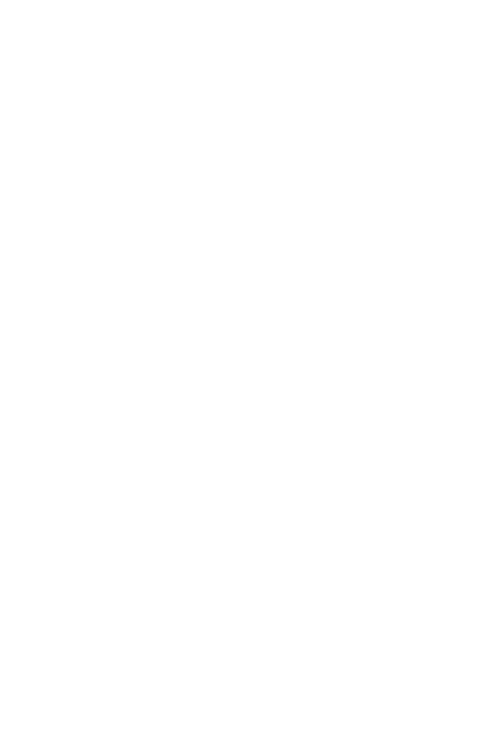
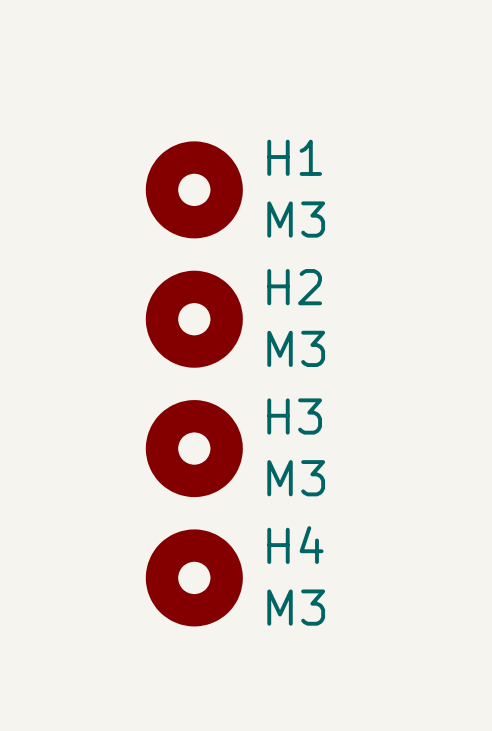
H1: none -> M3 (194, 189)
H2: none -> M3 (194, 319)
H3: none -> M3 (194, 448)
H4: none -> M3 (194, 577)

